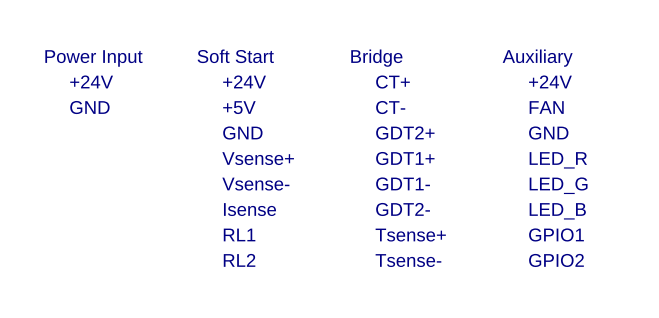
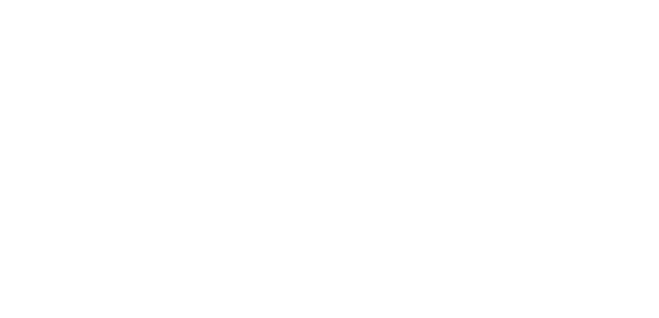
text: Soft Start (235, 56) -> none
text: Power Input (93, 58) -> none
text: Bridge (376, 58) -> none
text: Auxiliary (537, 58) -> none
text: +24V (91, 81) -> none
text: +24V (244, 81) -> none
text: +24V (550, 81) -> none
text: CT+ (392, 82) -> none
text: GND (89, 107) -> none
text: +5V (239, 107) -> none
text: CT- (390, 107) -> none
text: FAN (546, 107) -> none
text: GND (242, 133) -> none
text: GDT2+ (405, 133) -> none
text: GND (548, 133) -> none
text: Vsense+ (258, 158) -> none
text: GDT1+ (405, 158) -> none
text: LED_R (558, 160) -> none
text: GDT1- (403, 183) -> none
text: Vsense- (255, 184) -> none
text: LED_G (558, 185) -> none
text: Isense (250, 209) -> none
text: GDT2- (403, 209) -> none
text: LED_B (557, 211) -> none
text: RL1 (239, 234) -> none
text: GPIO1 (556, 234) -> none
text: Tsense+ (410, 235) -> none
text: RL2 (239, 260) -> none
text: Tsense- (408, 260) -> none
text: GPIO2 (556, 260) -> none

